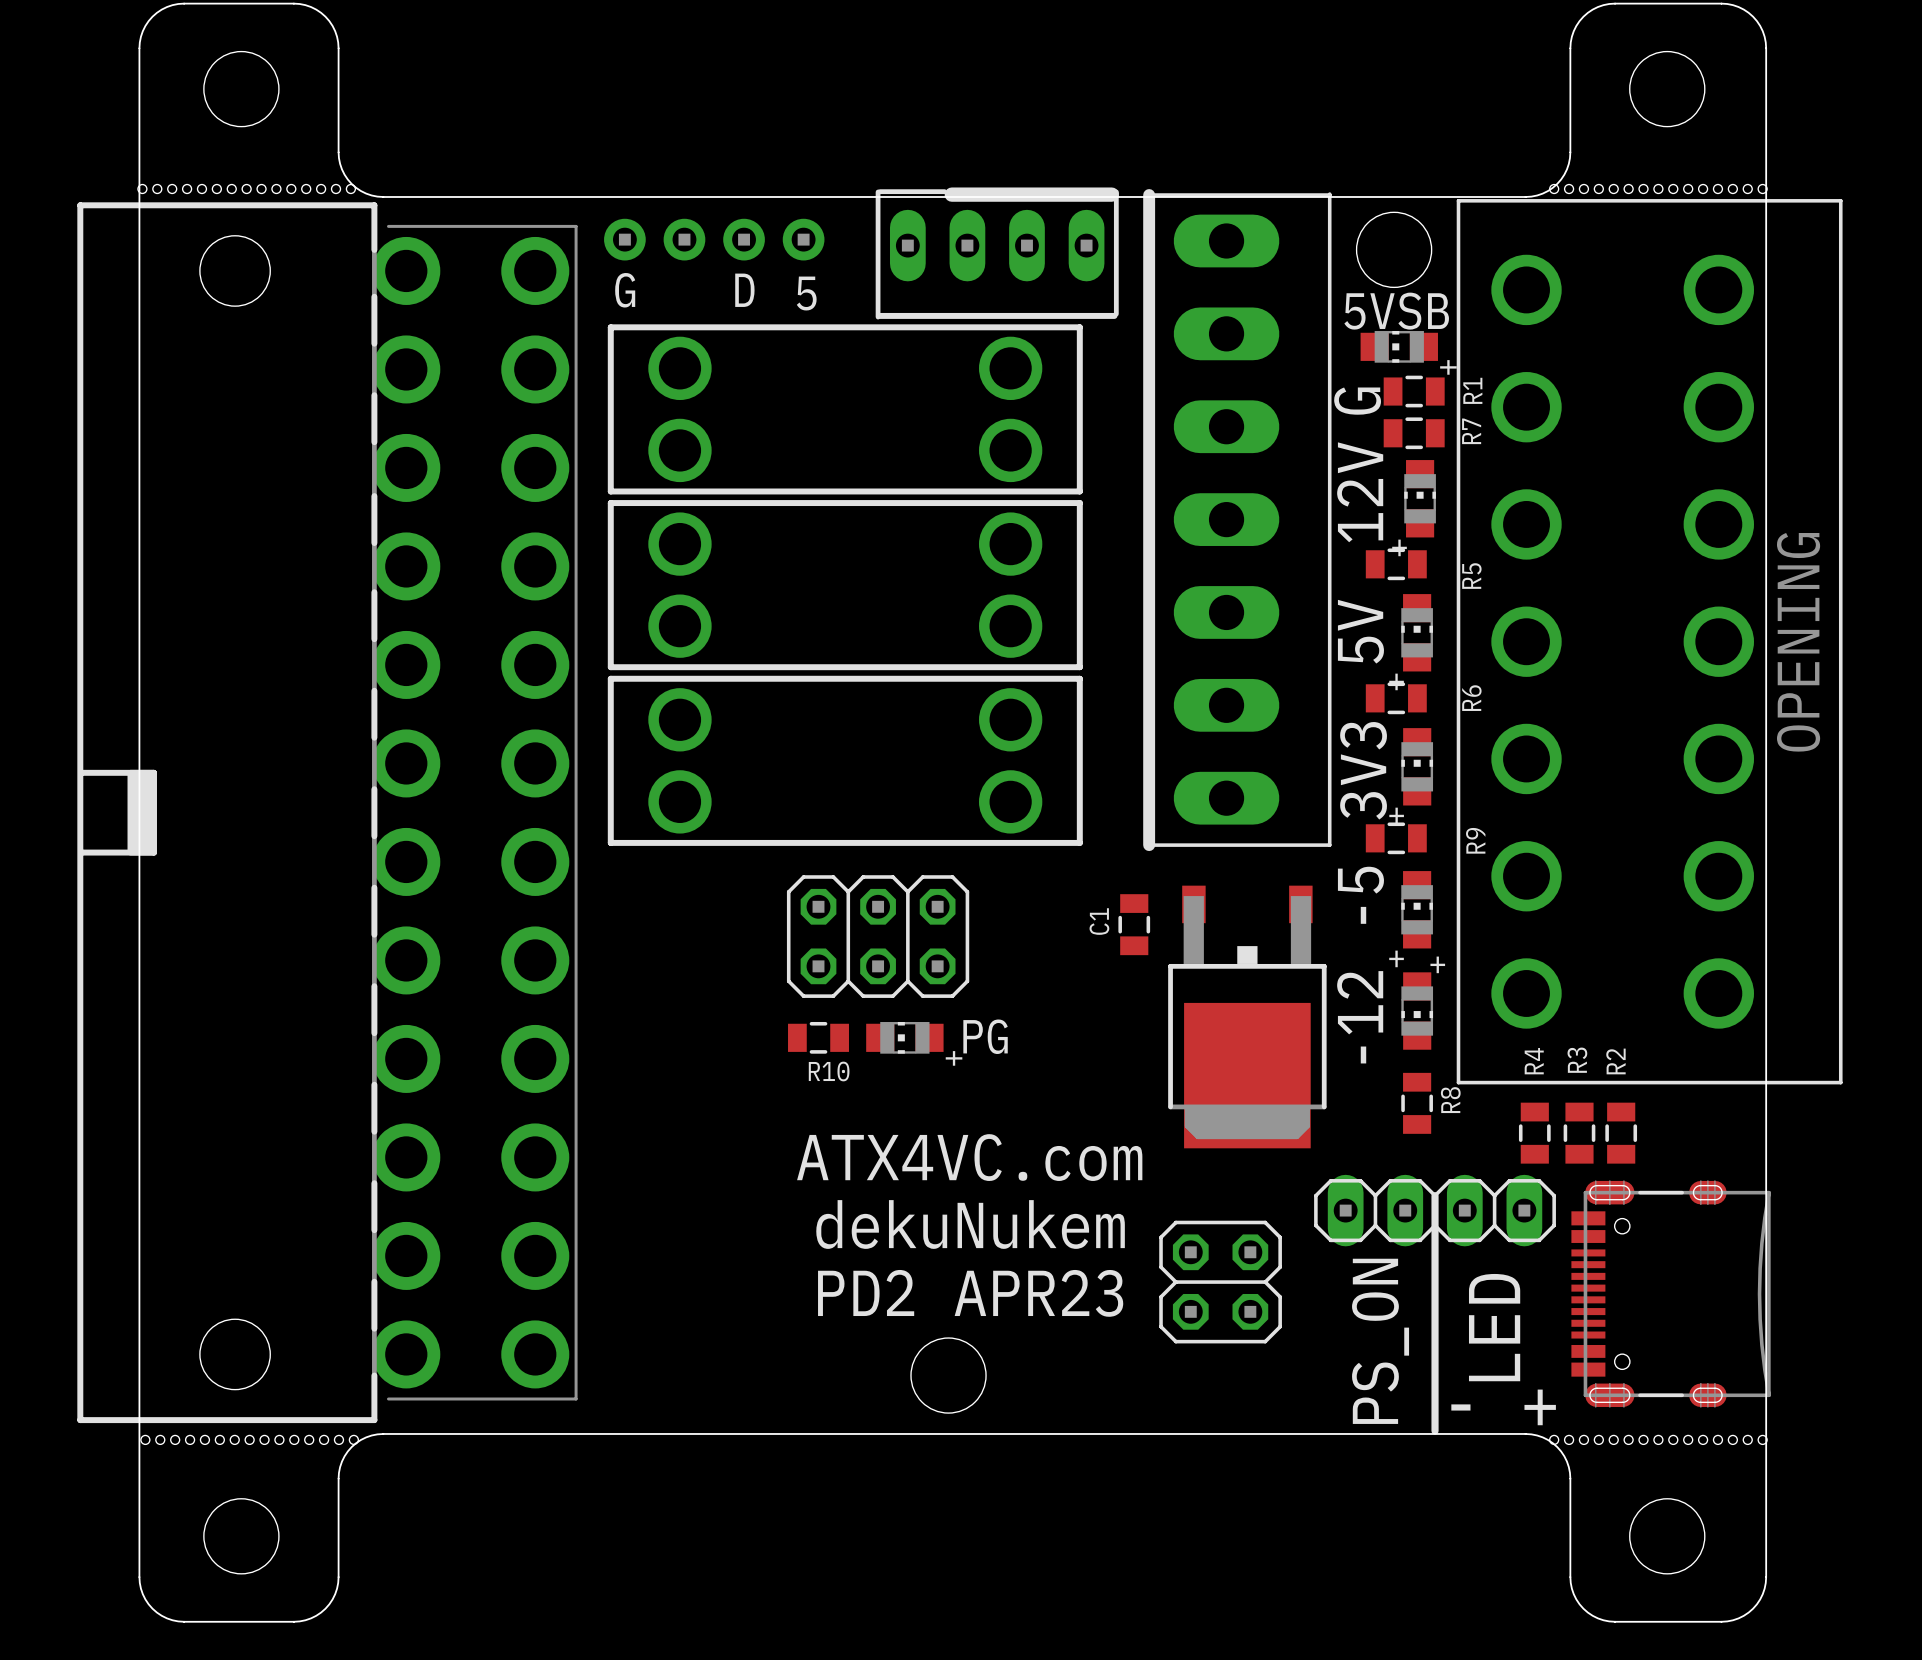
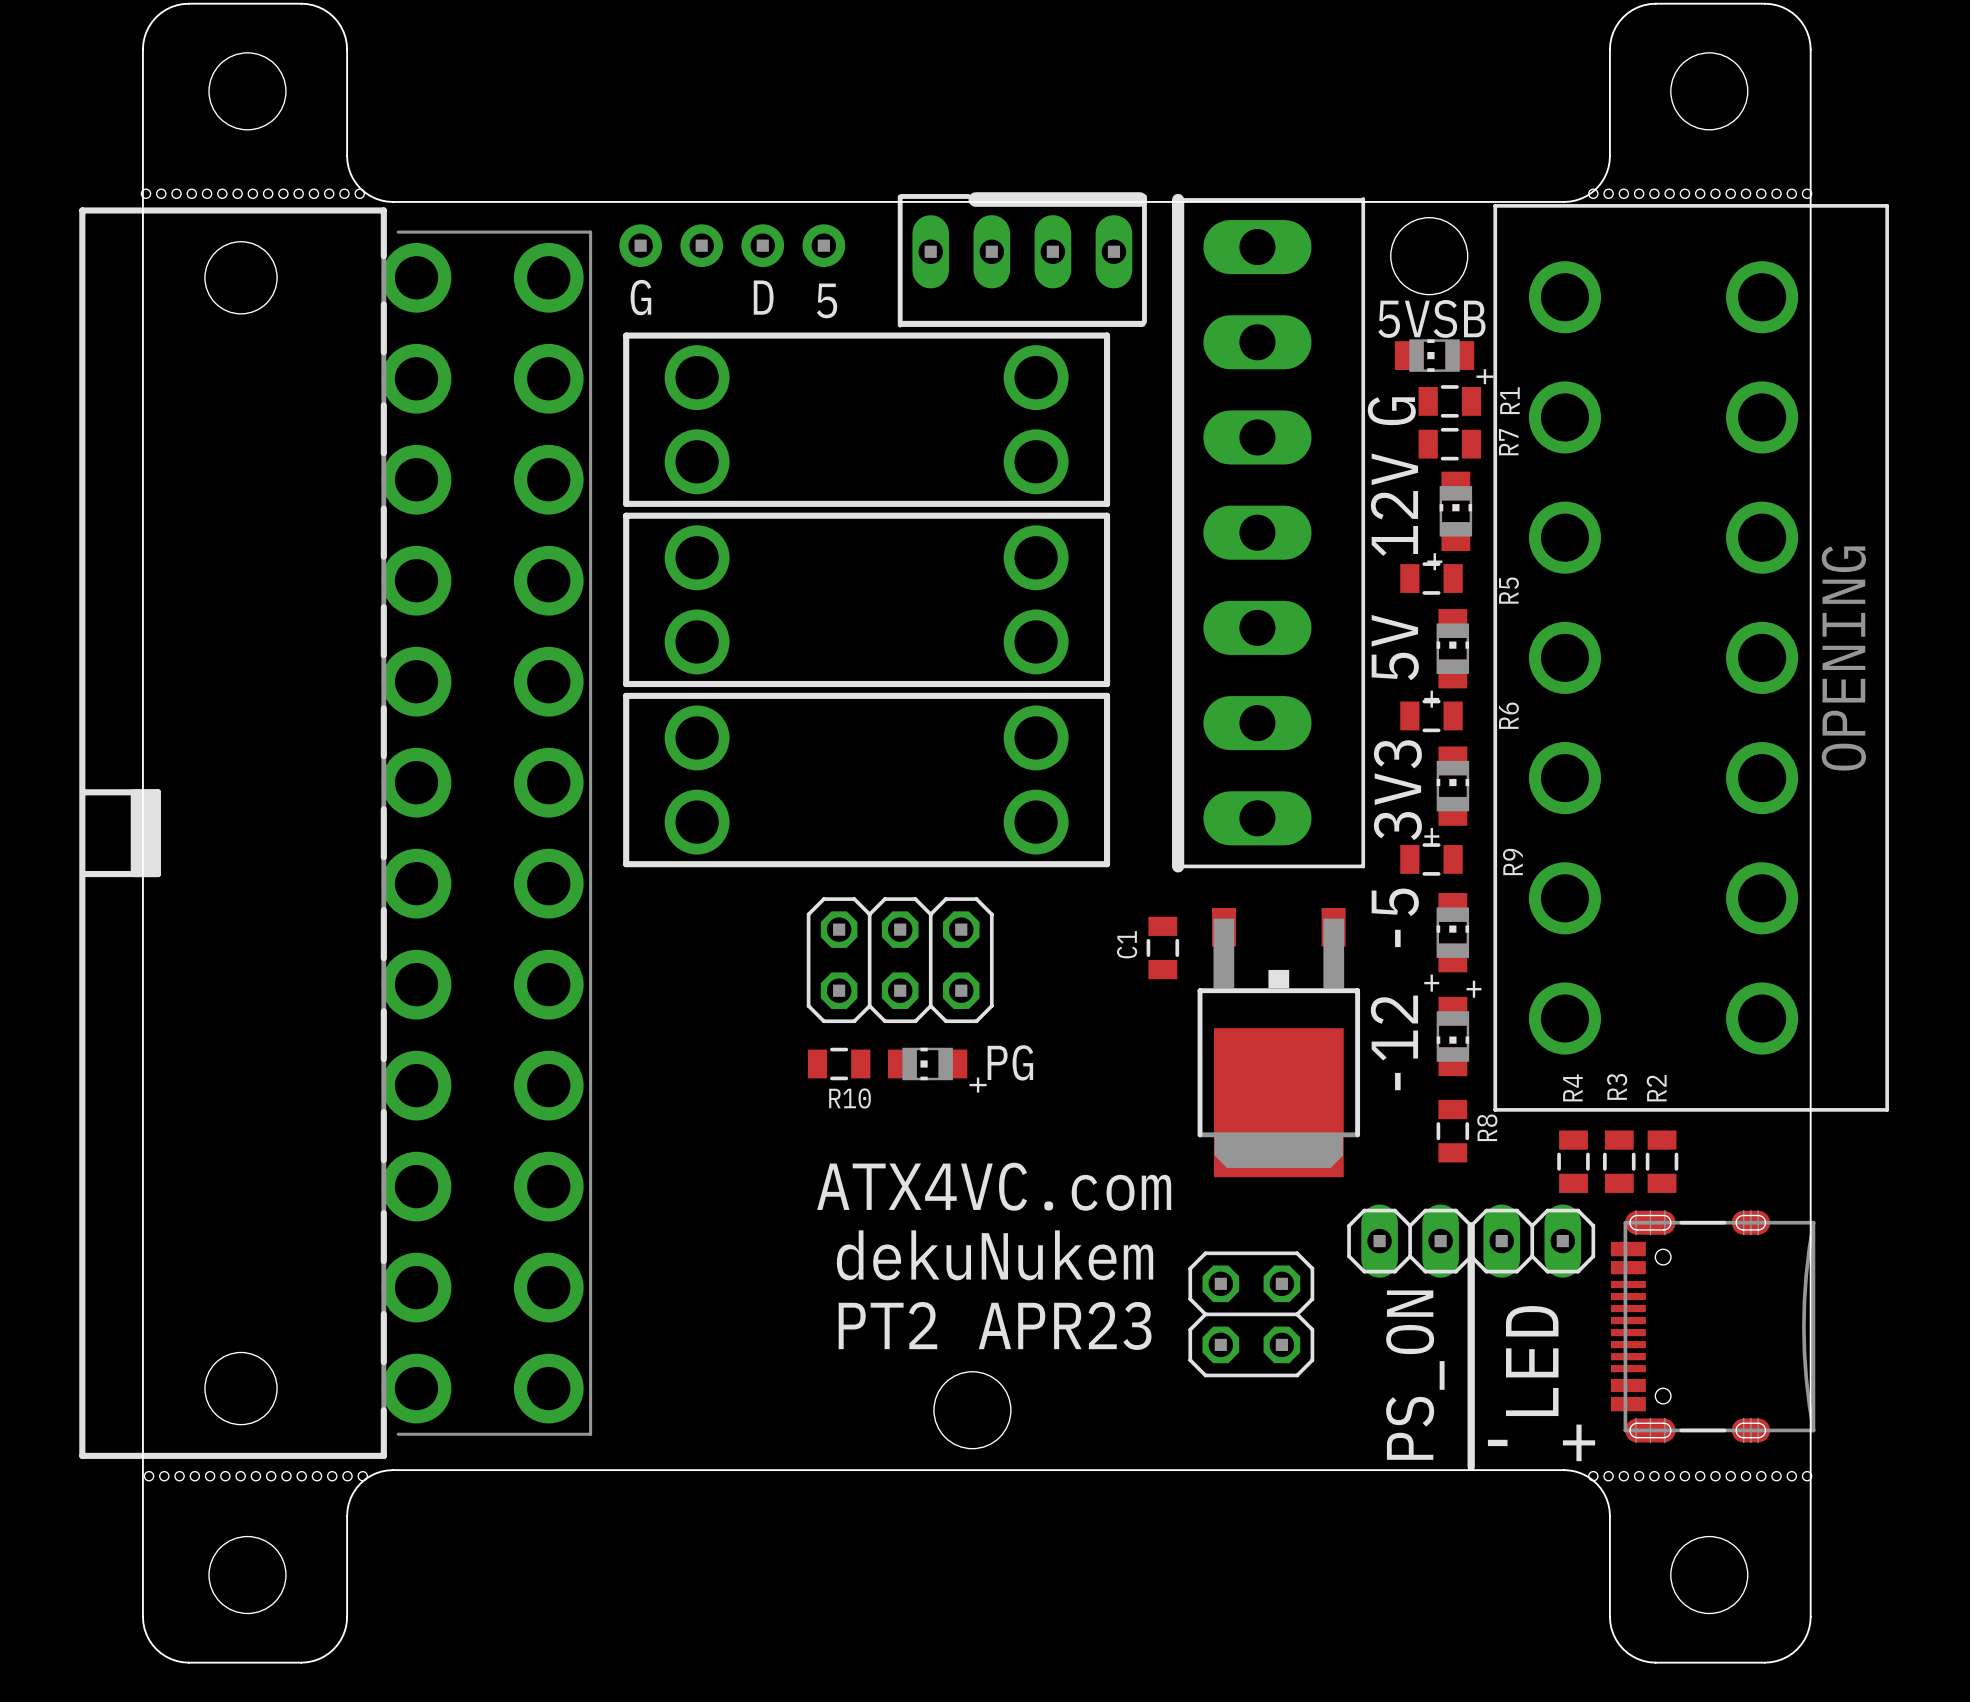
text: PD2 APR23 (970, 1293) -> PT2 APR23 (995, 1325)

